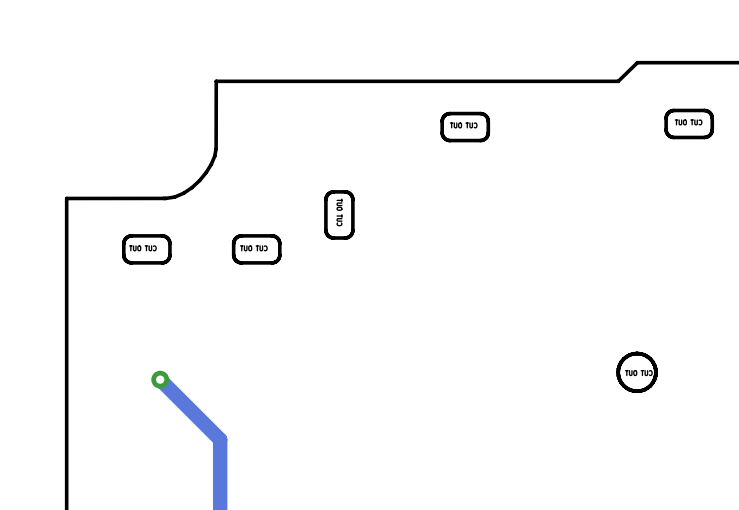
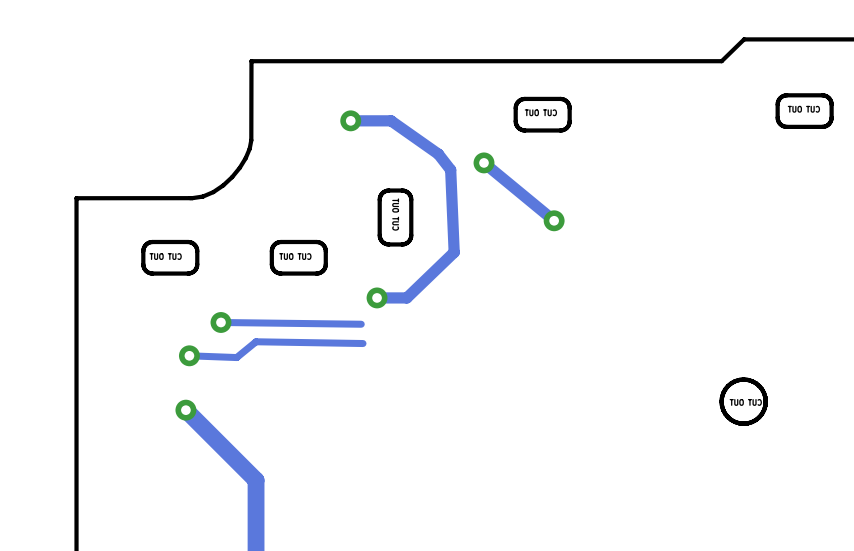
track: none -> (350, 120) (391, 120) (438, 154) (450, 169) (454, 252) (406, 297) (377, 297)
via: none -> (350, 120)
track: none -> (484, 162) (554, 220)
via: none -> (484, 162)
via: none -> (554, 220)
via: none -> (377, 297)
track: none -> (220, 322) (361, 324)
via: none -> (220, 322)
track: none -> (363, 343) (256, 341) (236, 357) (189, 355)
via: none -> (189, 355)

